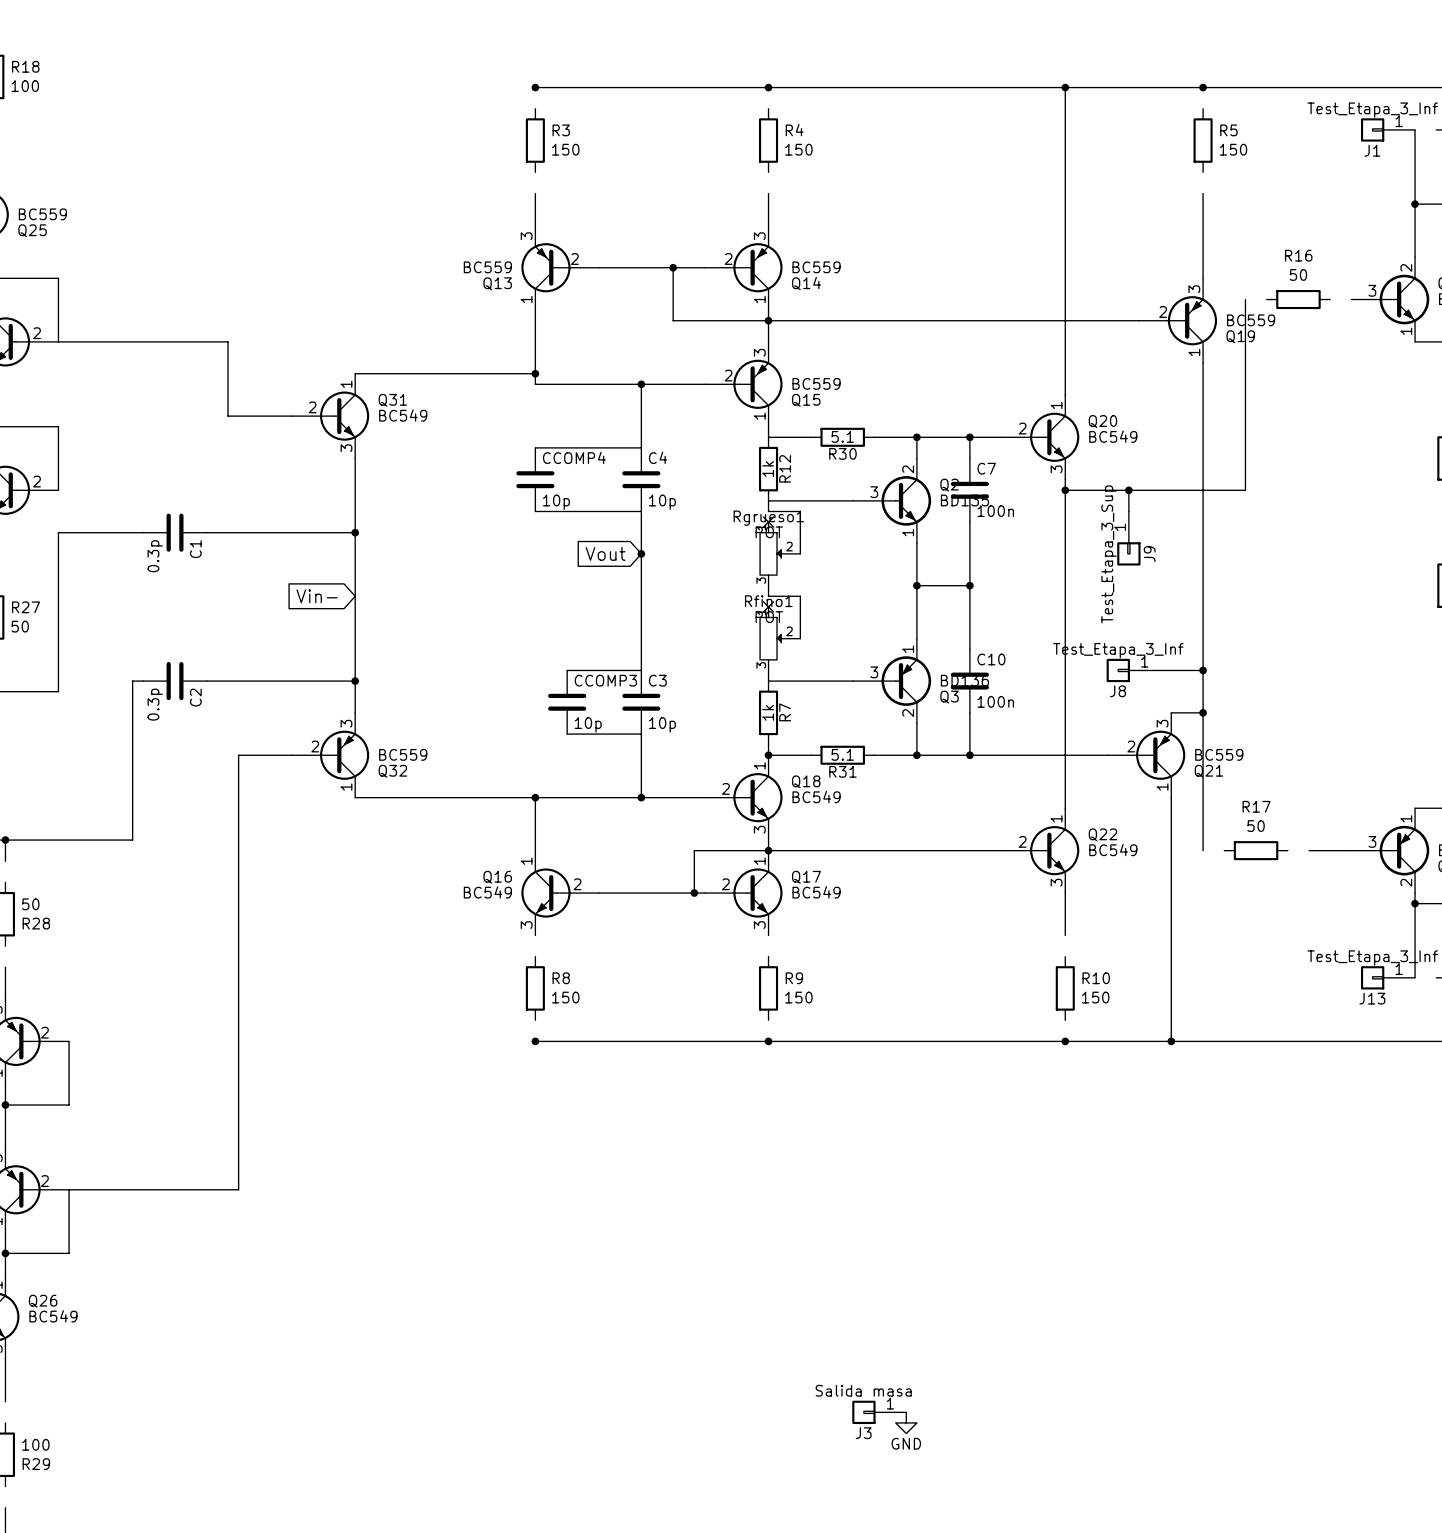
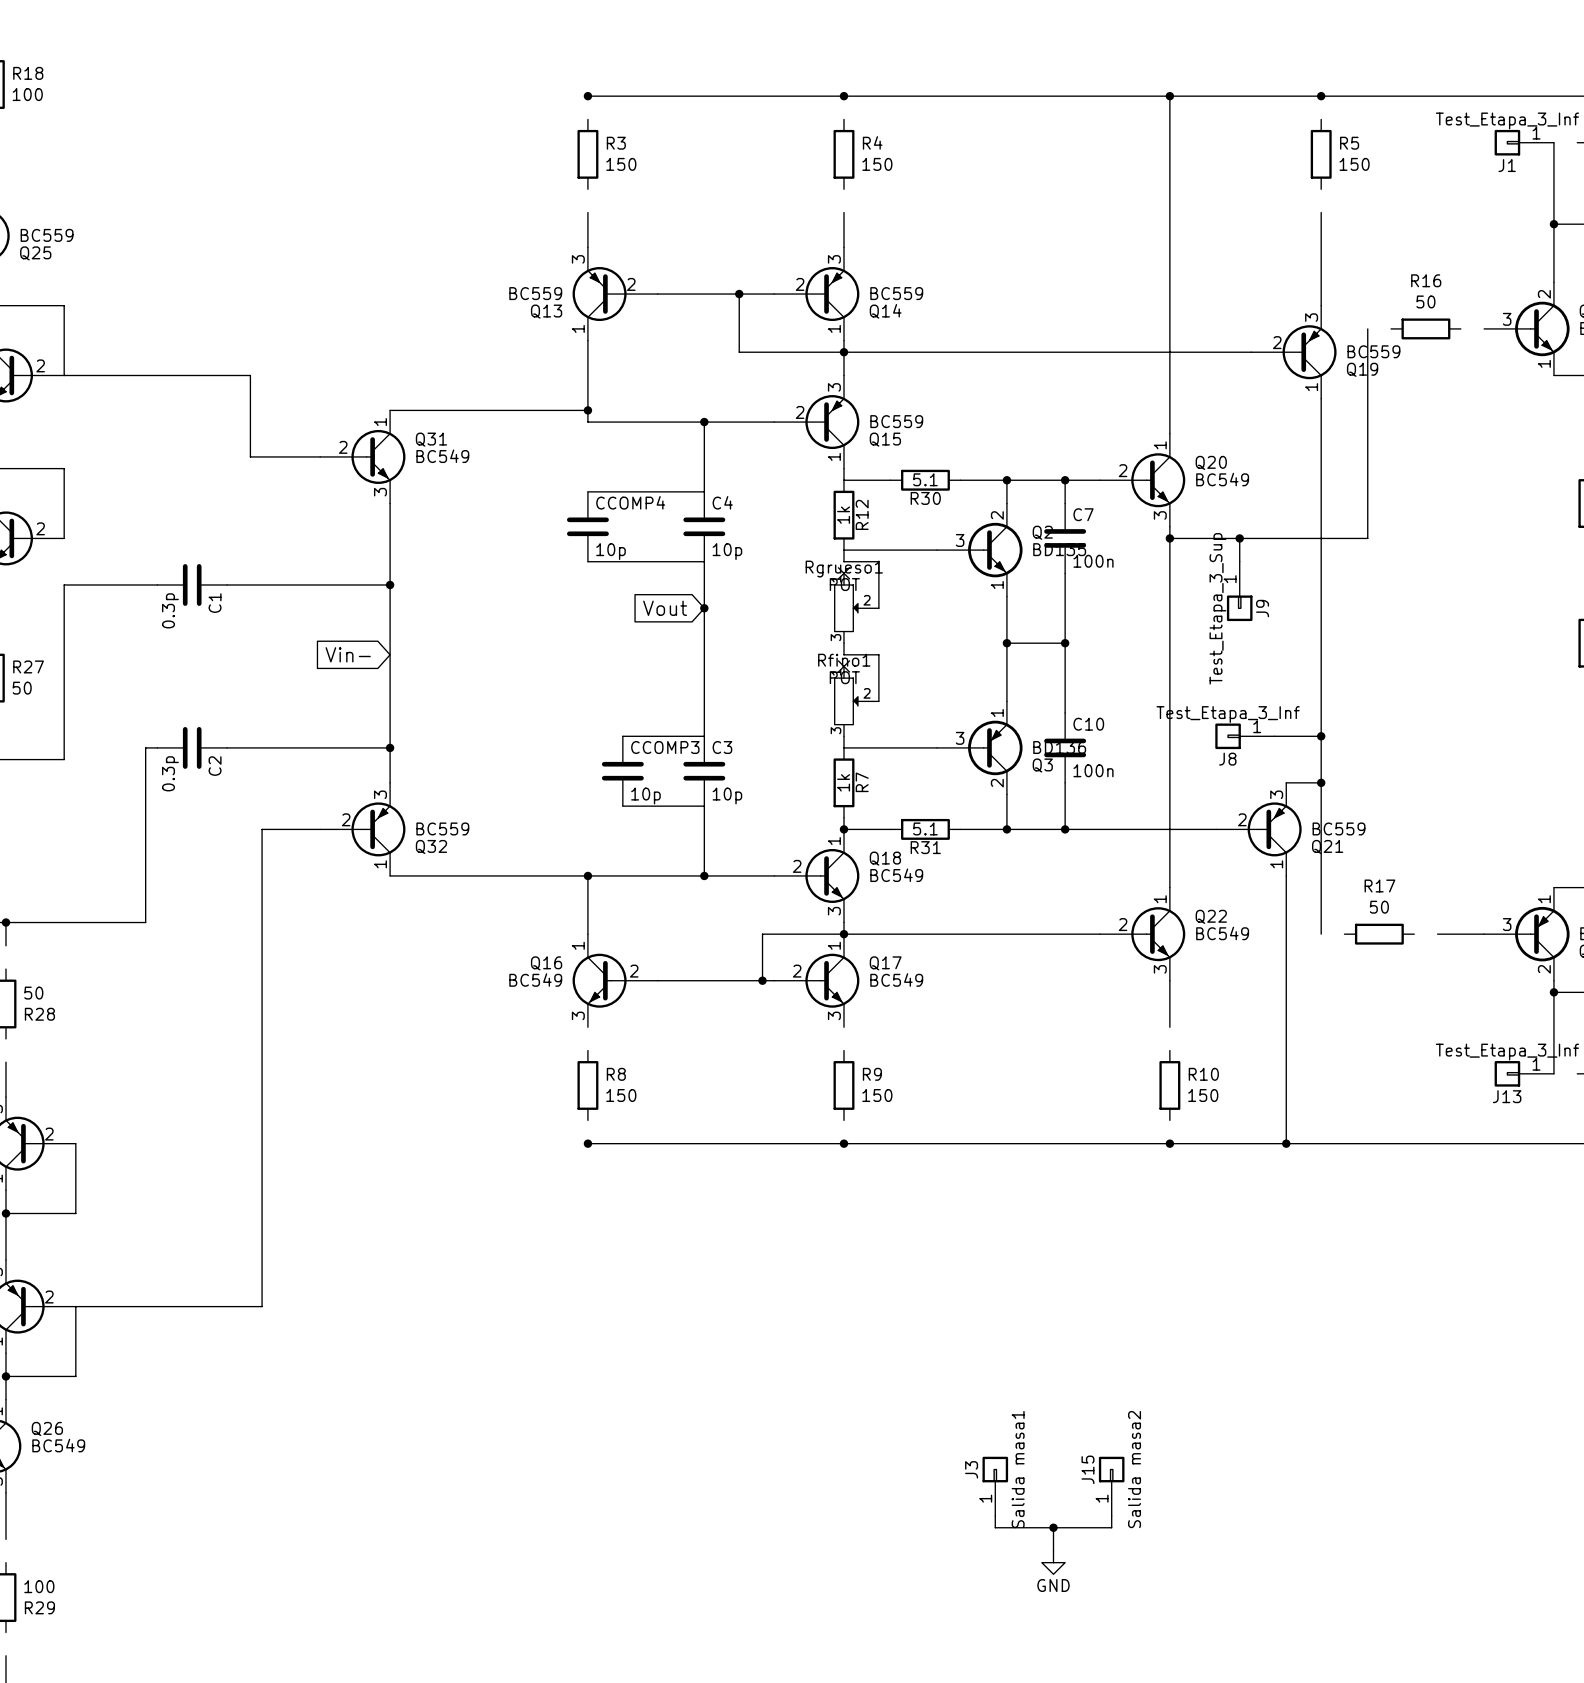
J15: none -> Salida masa2 (1111, 1486)
wire: none -> (995, 1516) (995, 1527) (1111, 1527) (1111, 1516)
J3 value: Salida masa (863, 1390) -> Salida masa1 (1018, 1469)
wire: none -> (1053, 1527) (1053, 1551)
junction: none -> (1053, 1527)
J3 rotation: 0° (863, 1412) -> 90° clockwise (995, 1469)
J3 position: (879, 1412) -> (995, 1486)
power symbol position: GND (906, 1422) -> GND (1053, 1562)

